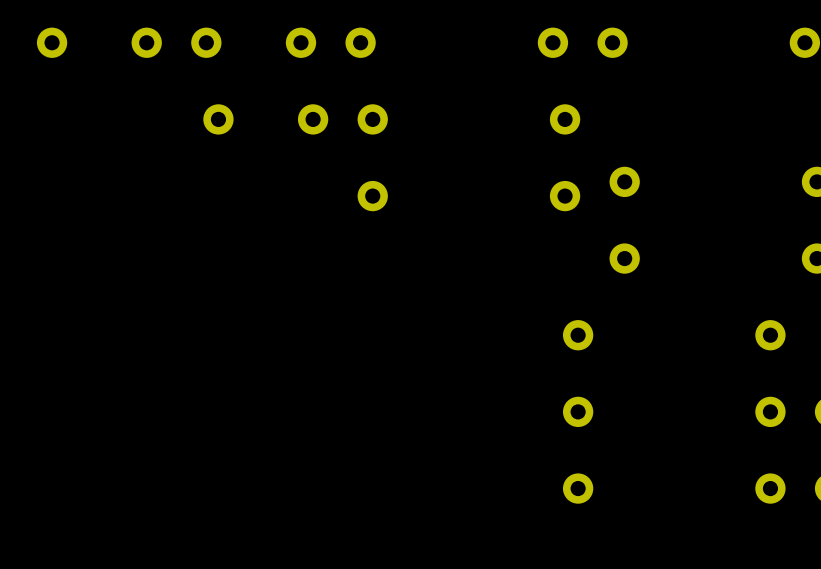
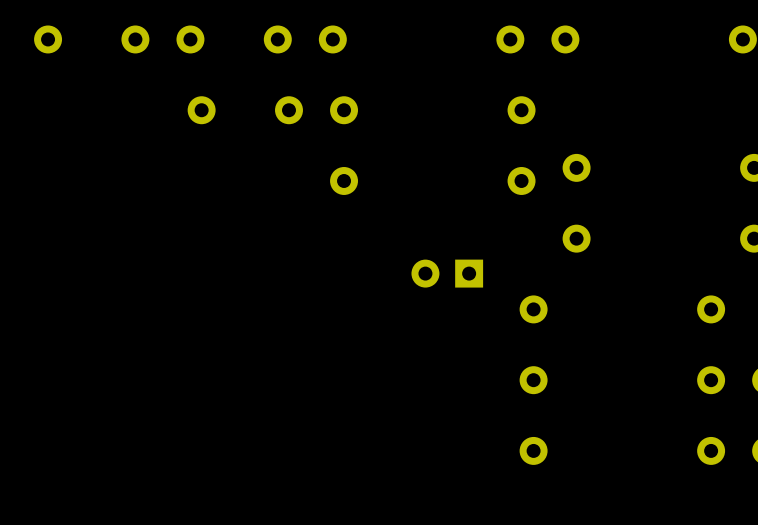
part: none -> (447, 273)

